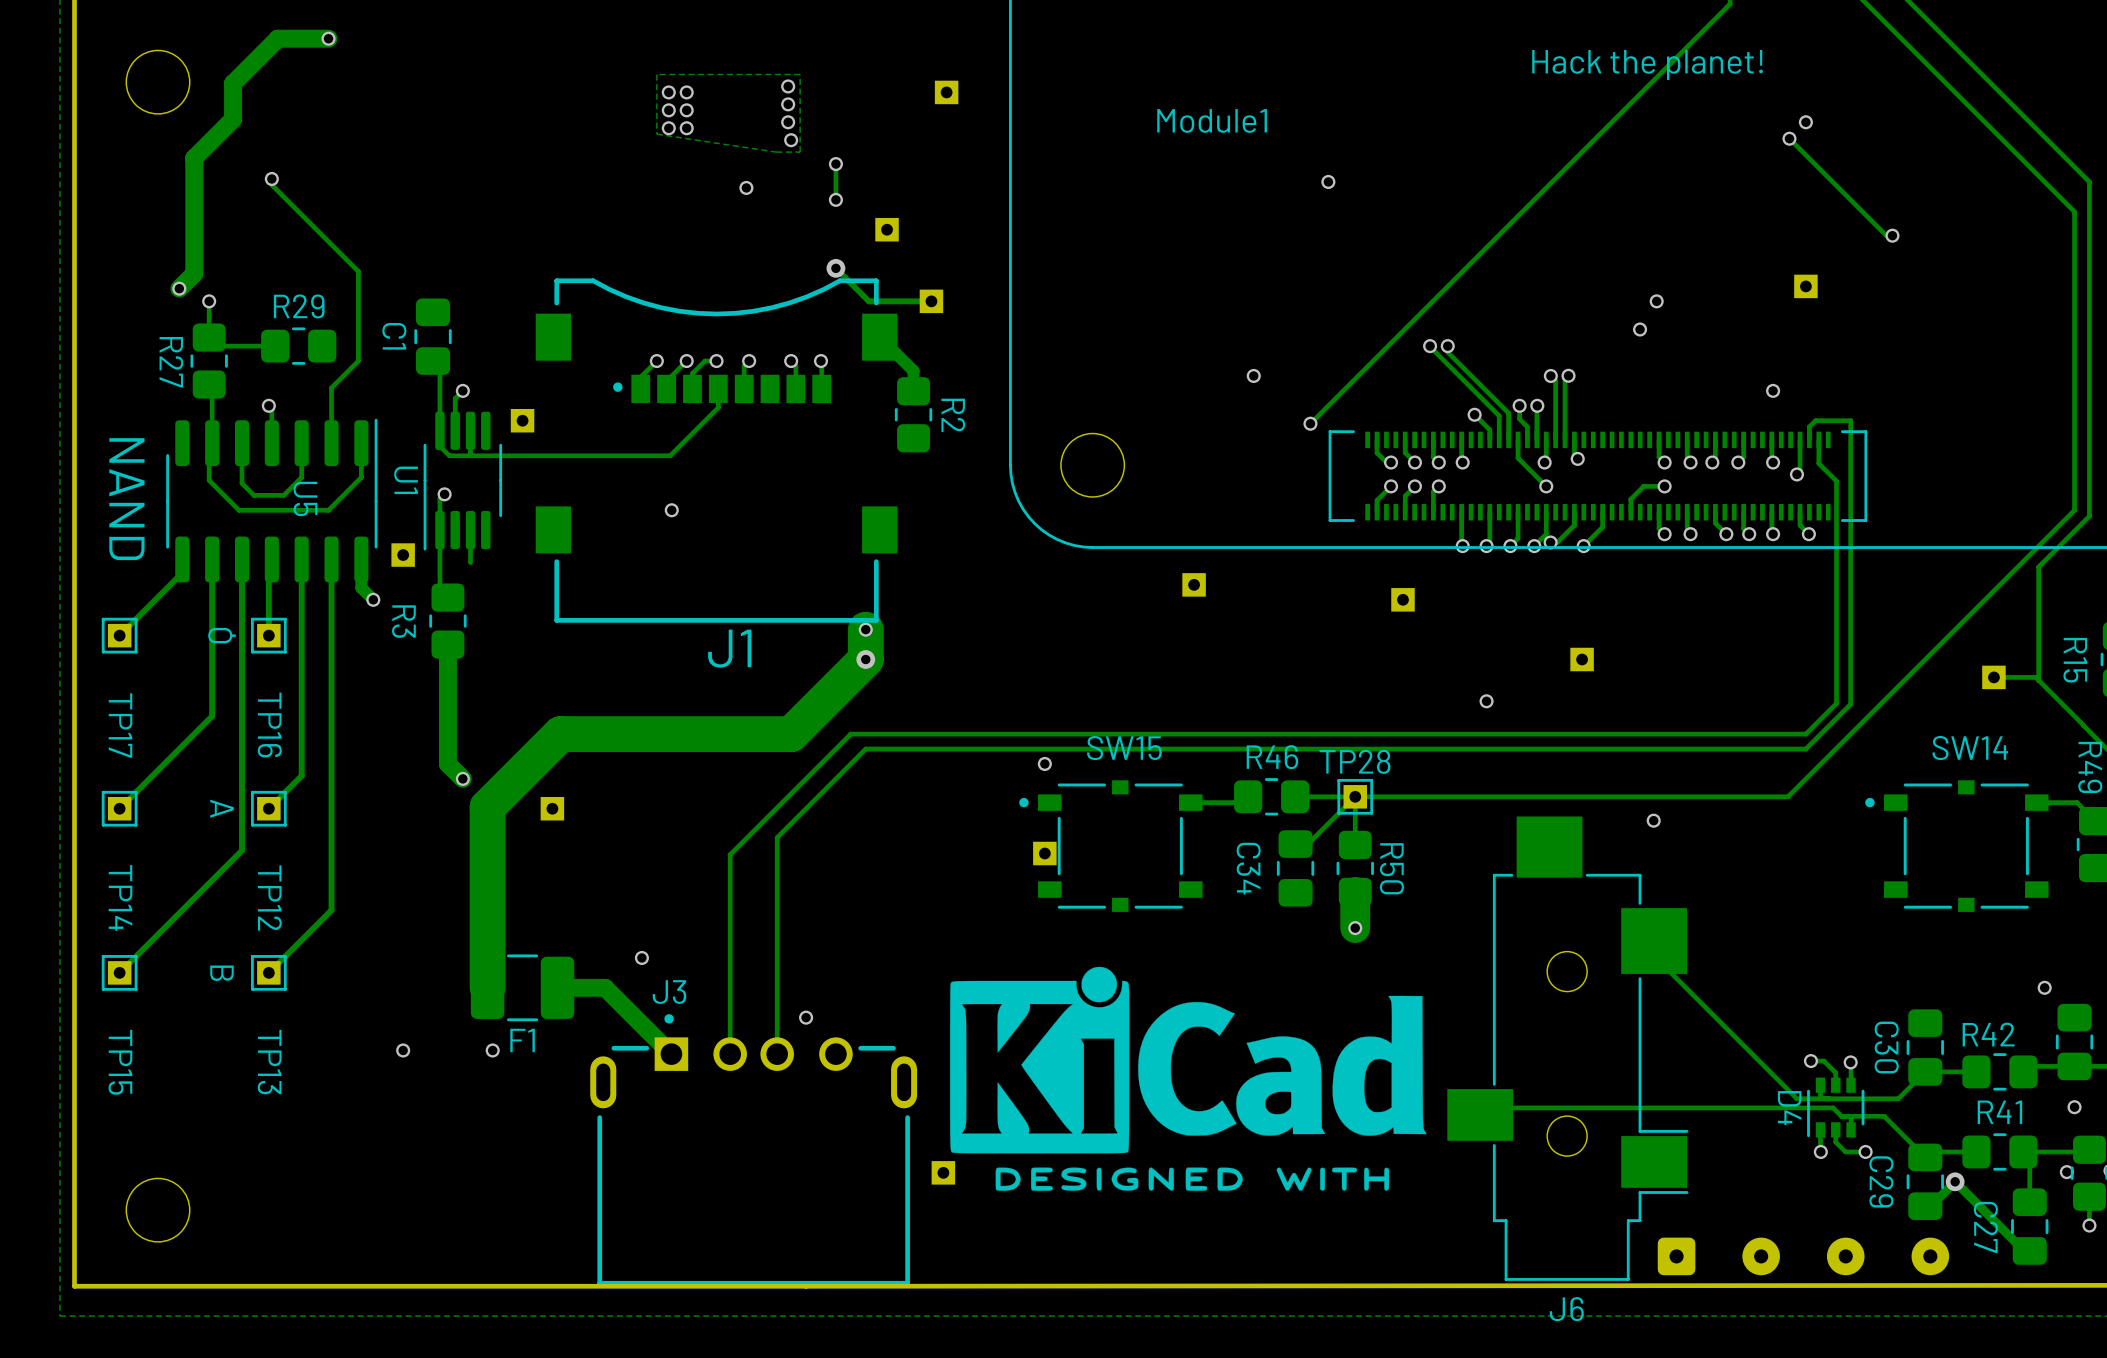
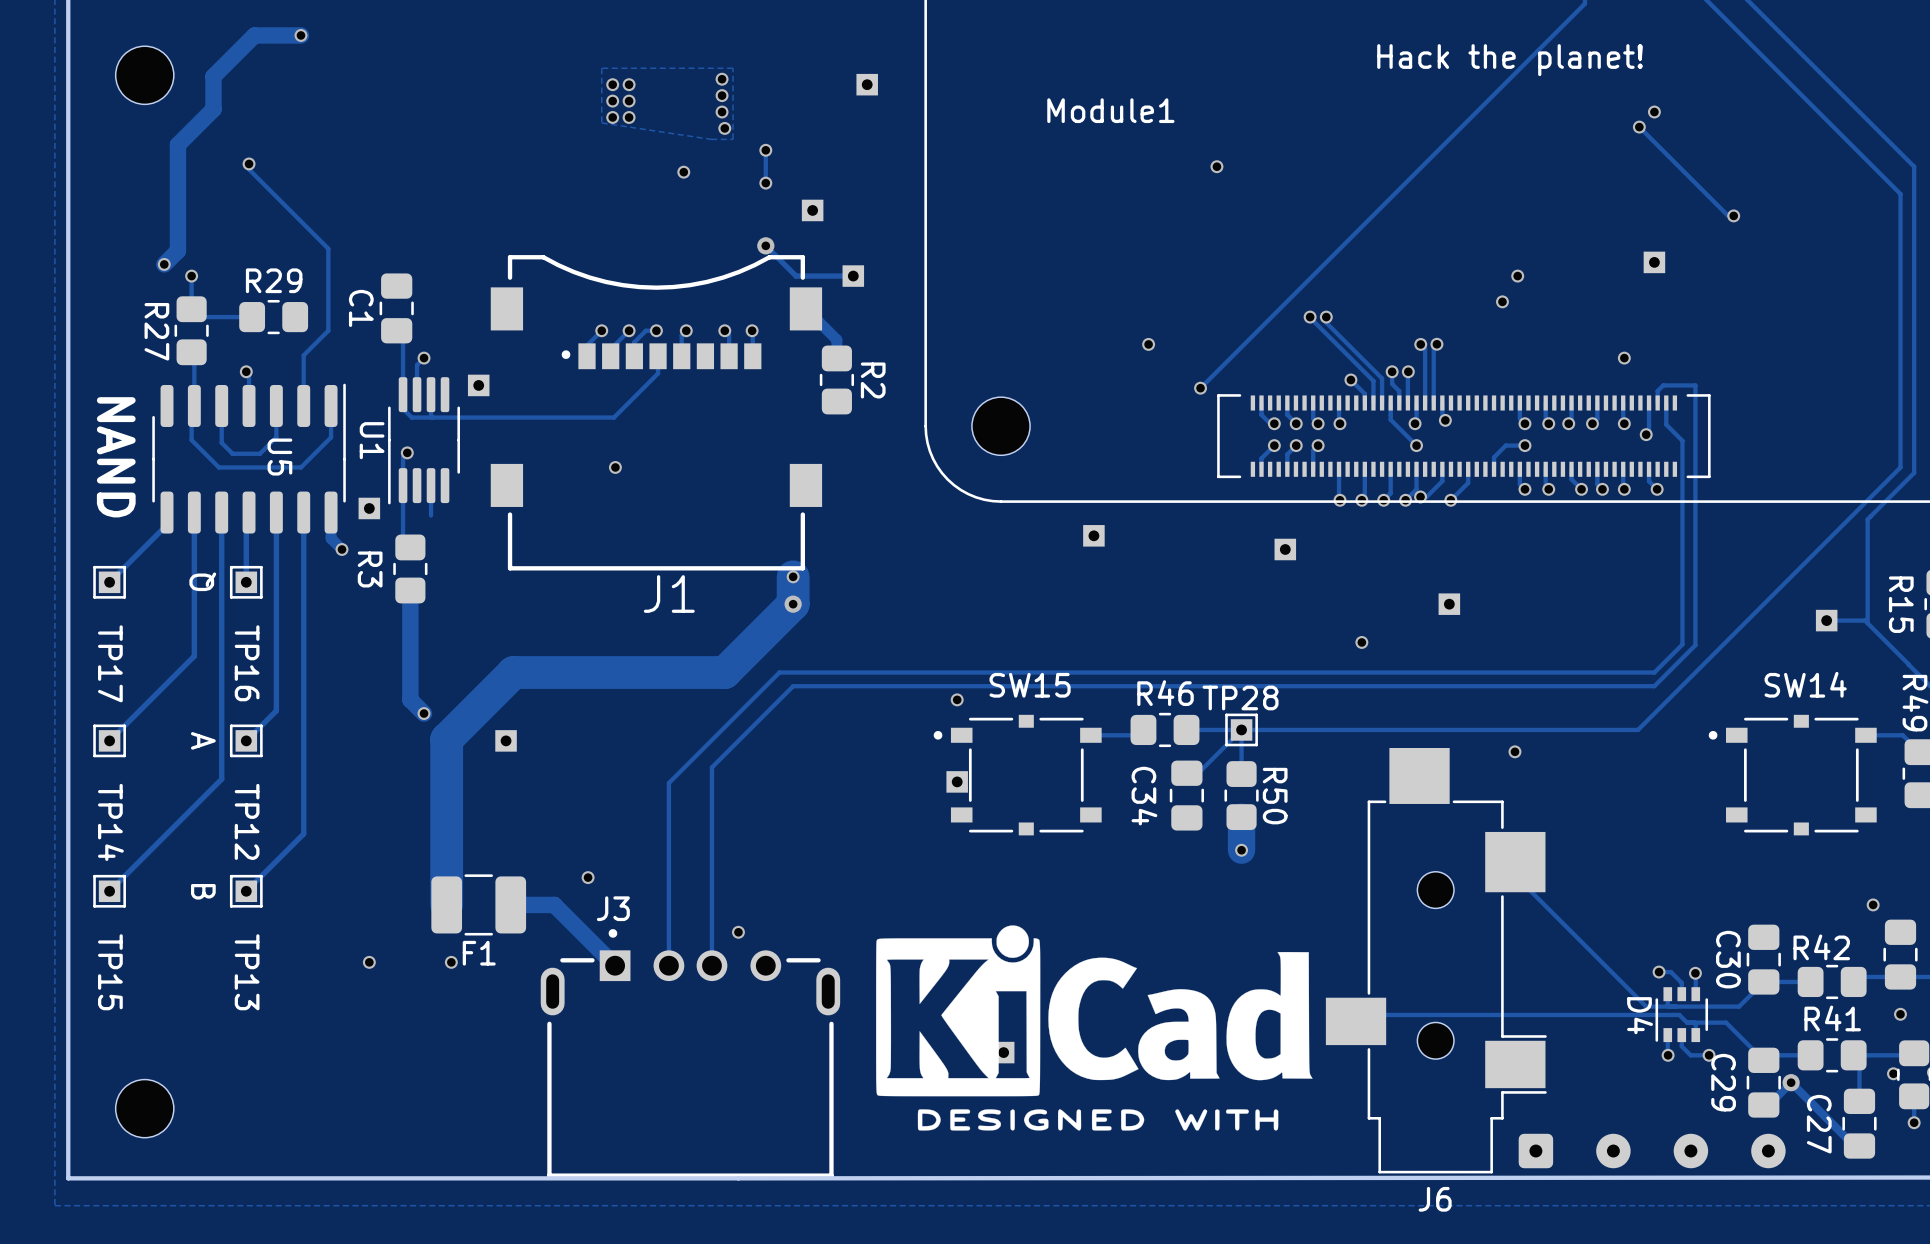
drawing position: (1188, 1078) -> (1094, 1027)
part position: (943, 1172) -> (1003, 1052)

